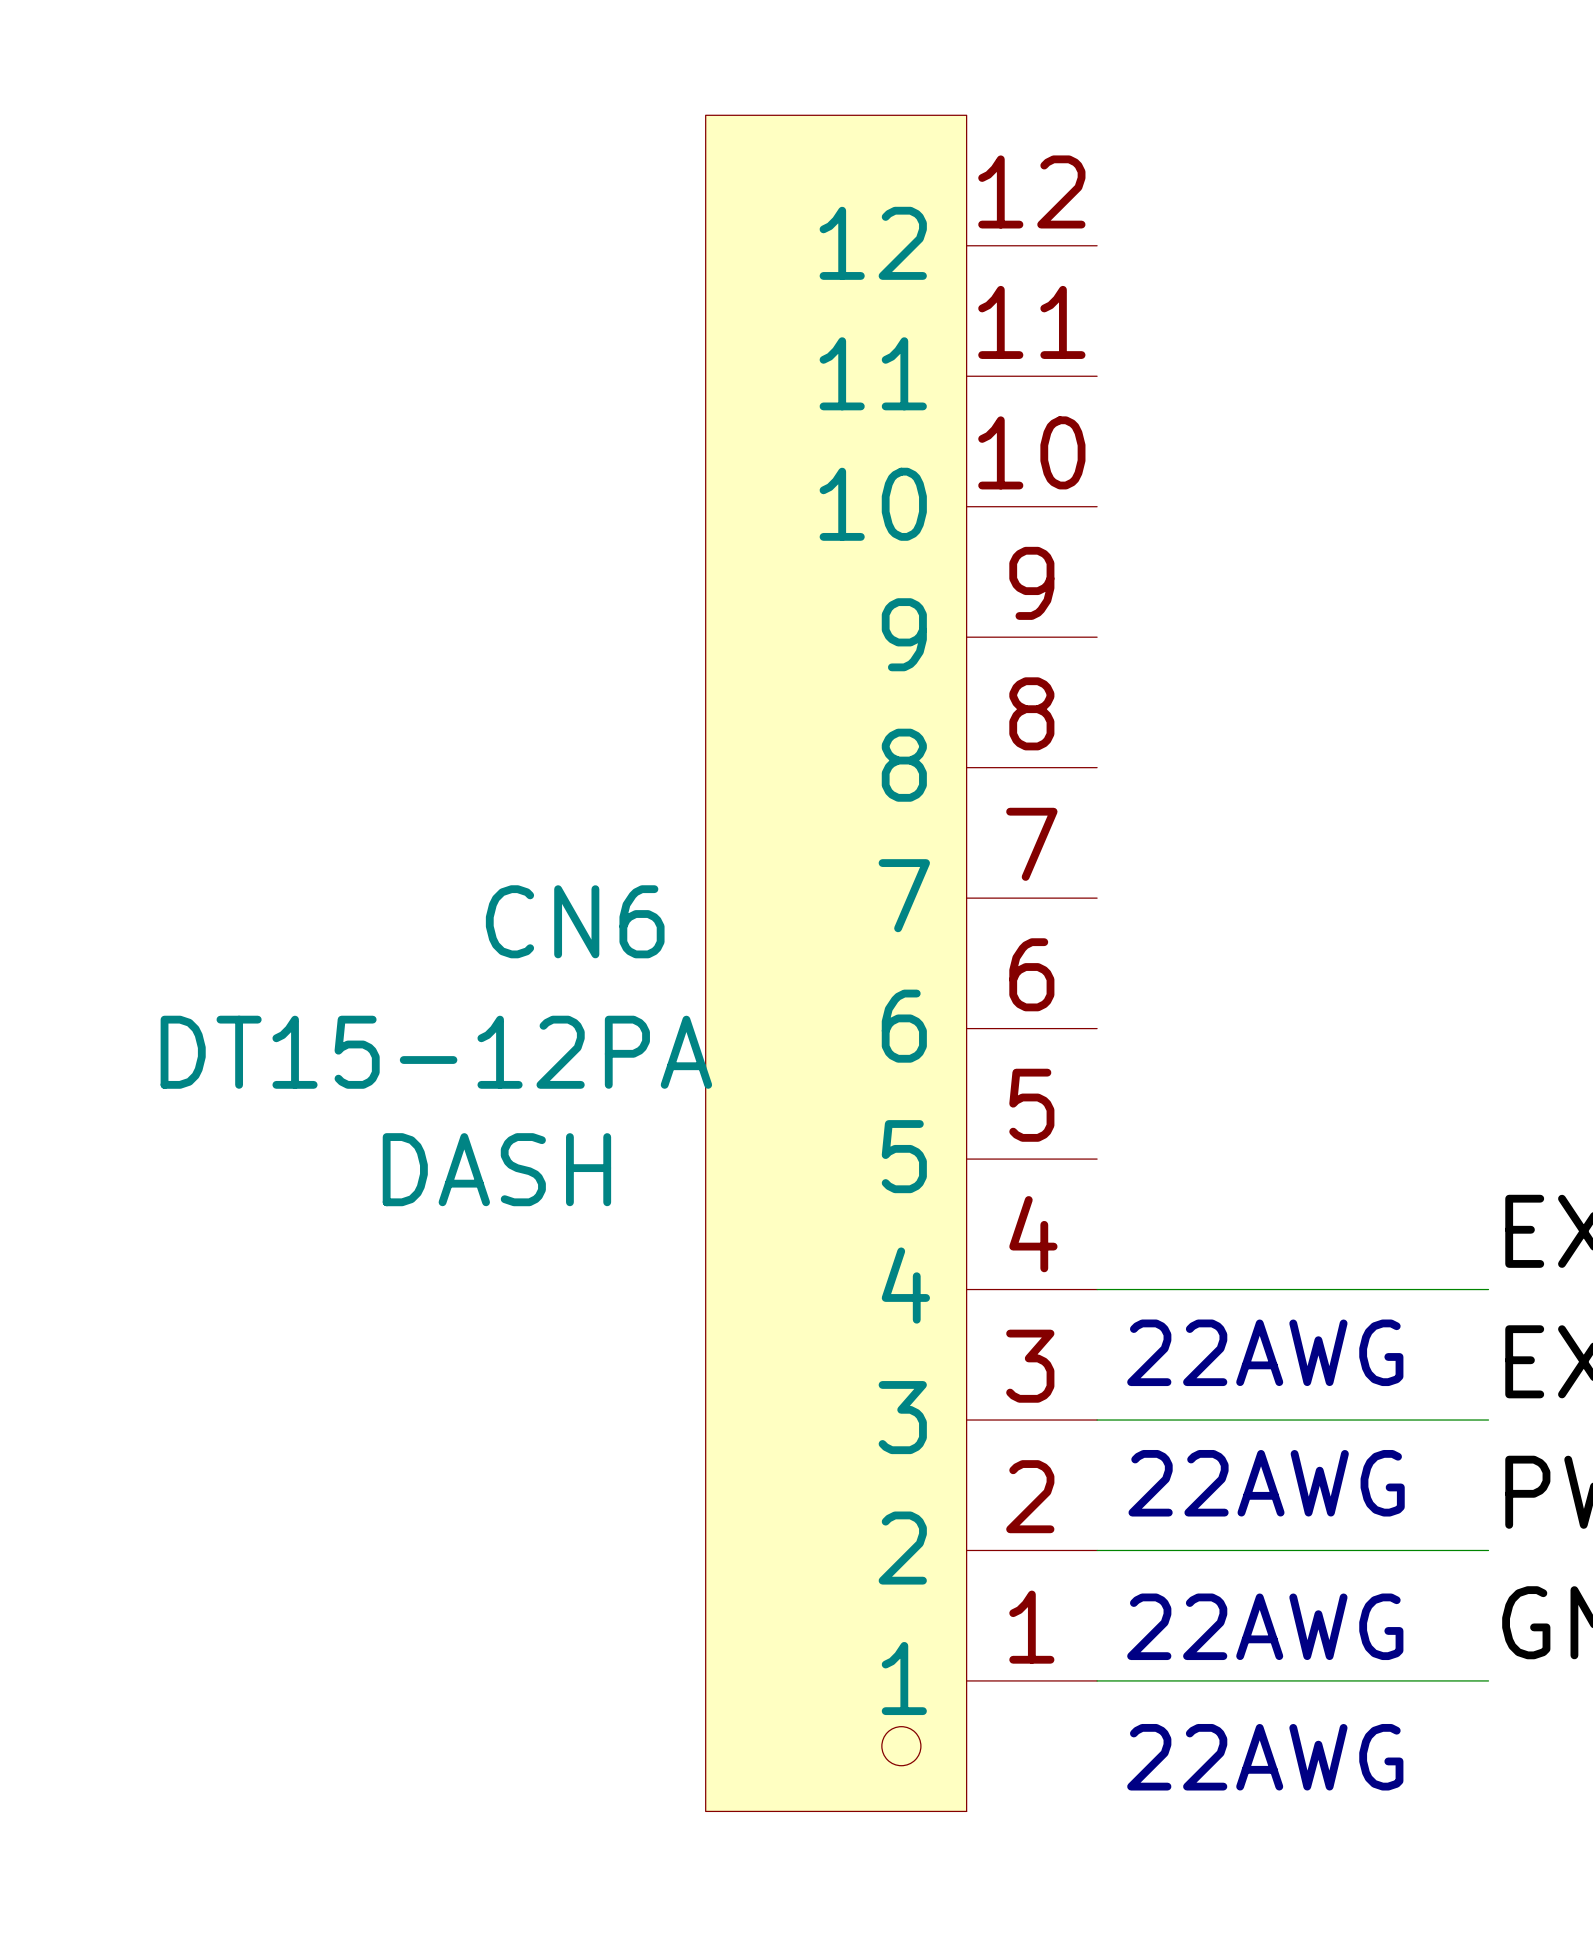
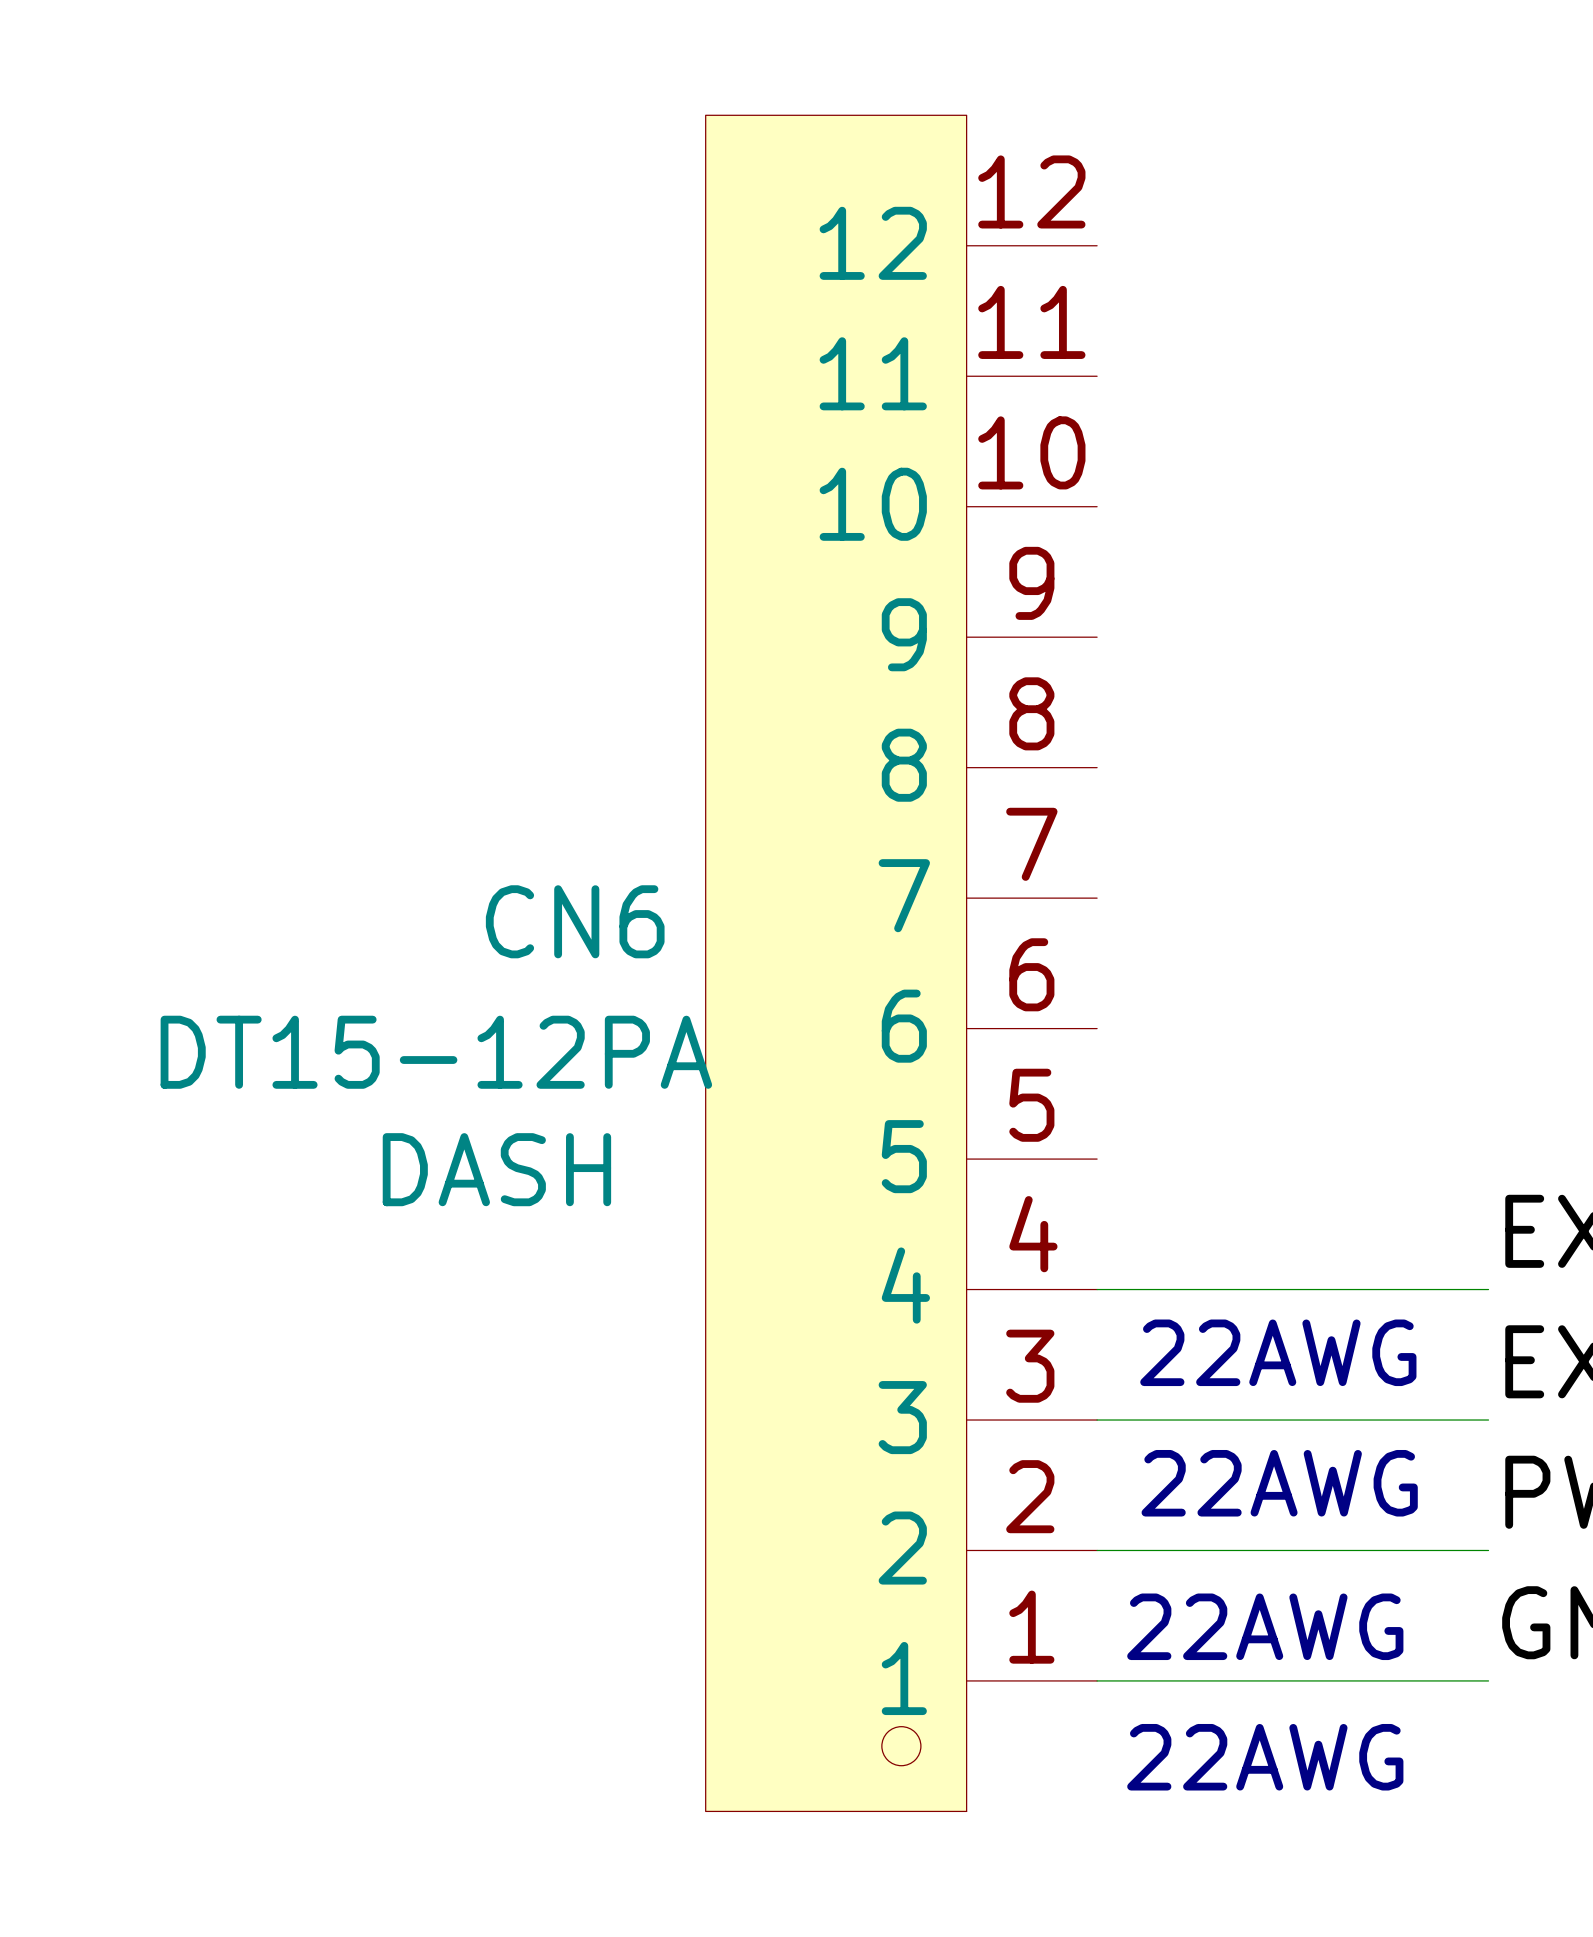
text position: 22AWG (1265, 1352) -> 22AWG (1278, 1352)
text position: 22AWG (1266, 1483) -> 22AWG (1279, 1483)

